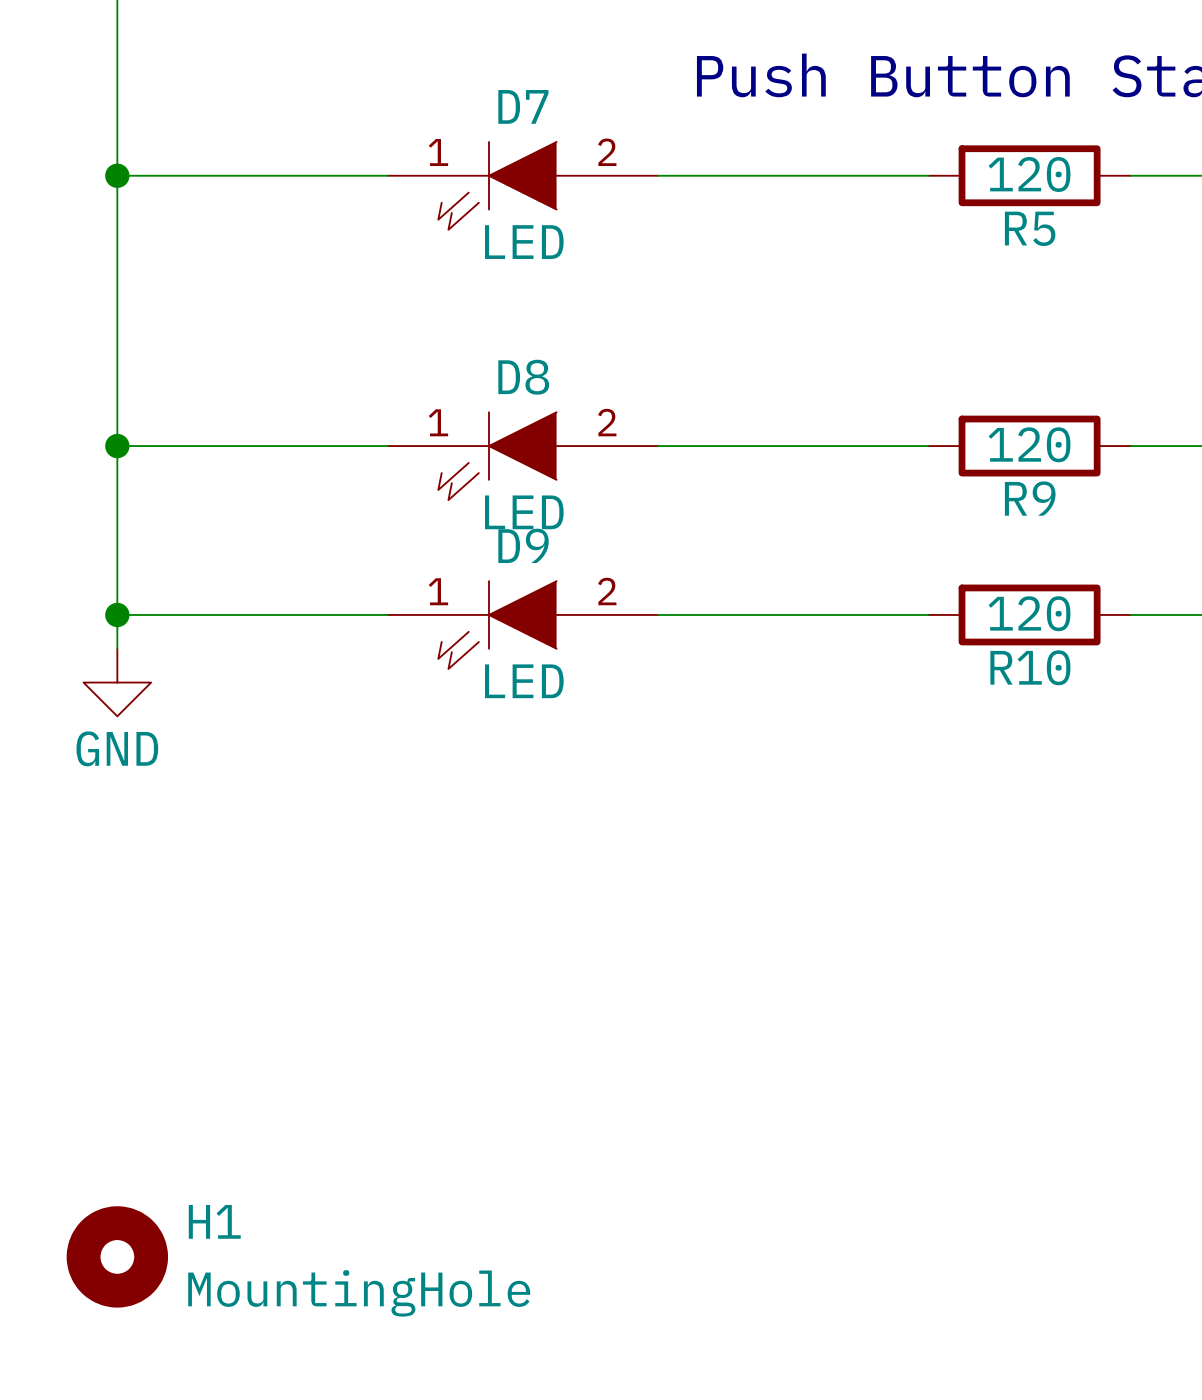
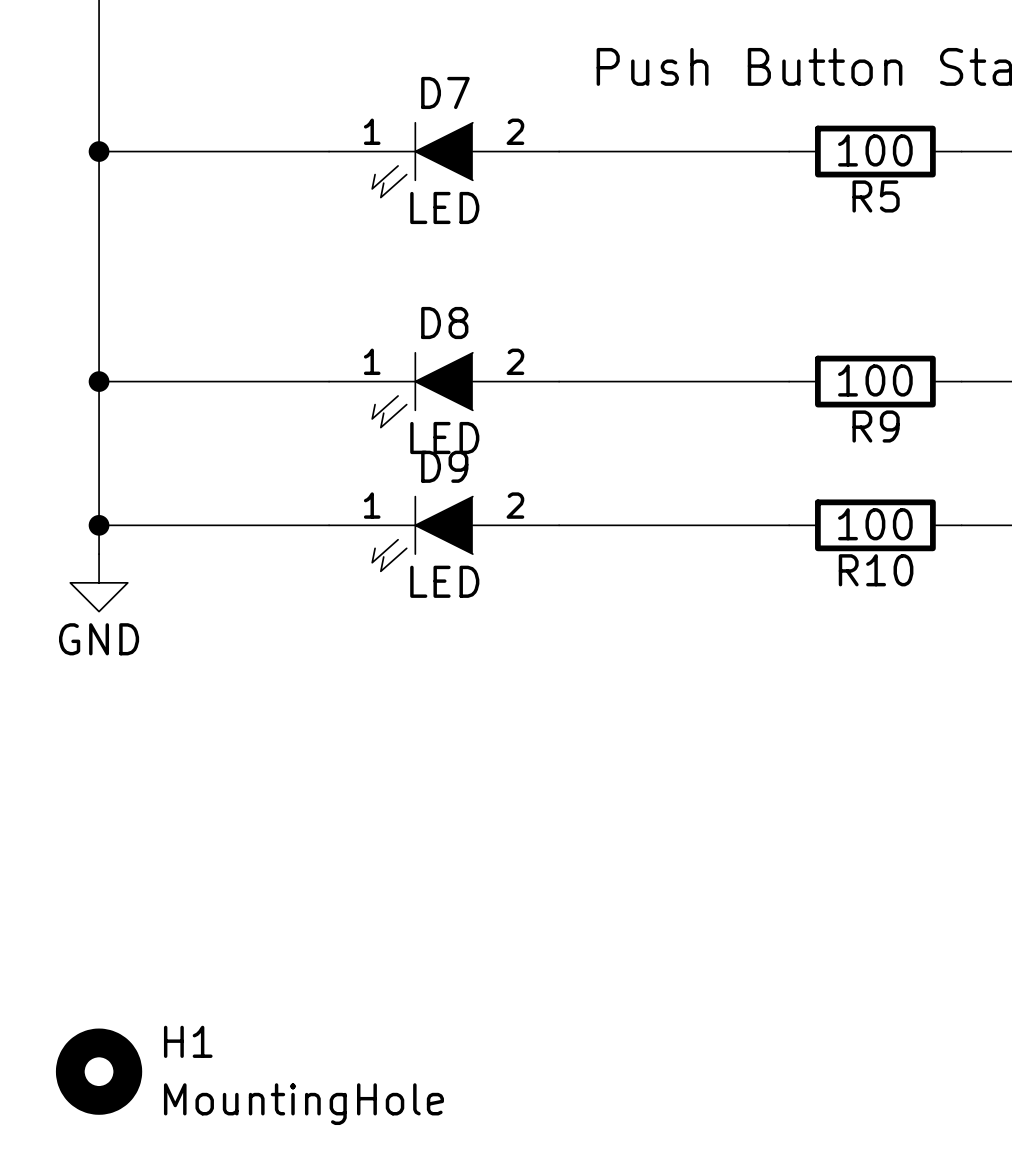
R5 value: 120 (1029, 174) -> 100 (875, 150)
R9 value: 120 (1029, 444) -> 100 (875, 380)
R10 value: 120 (1029, 613) -> 100 (875, 524)

